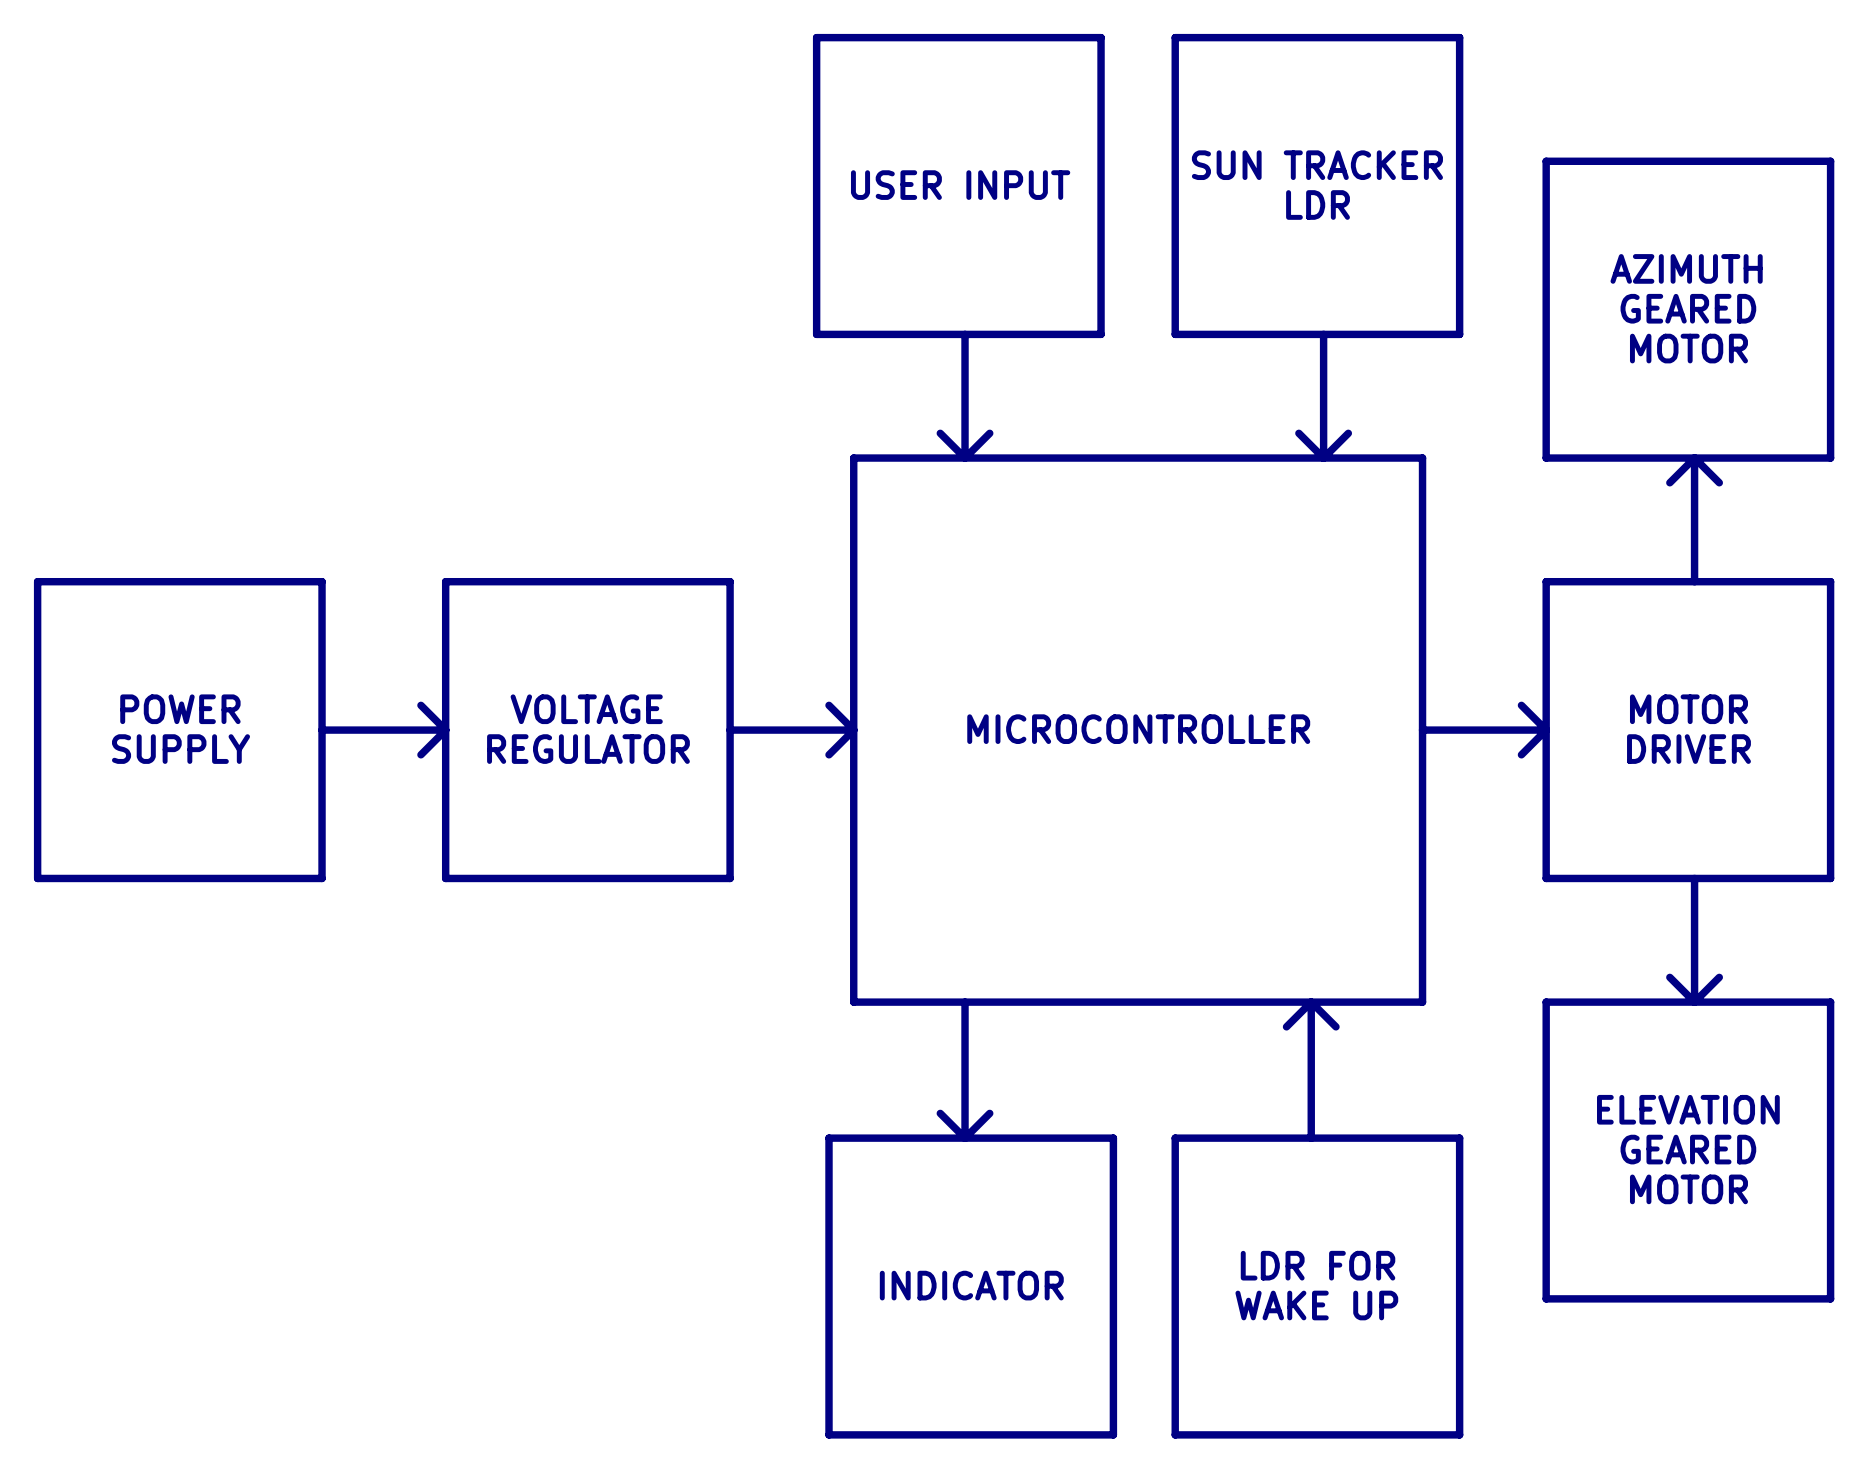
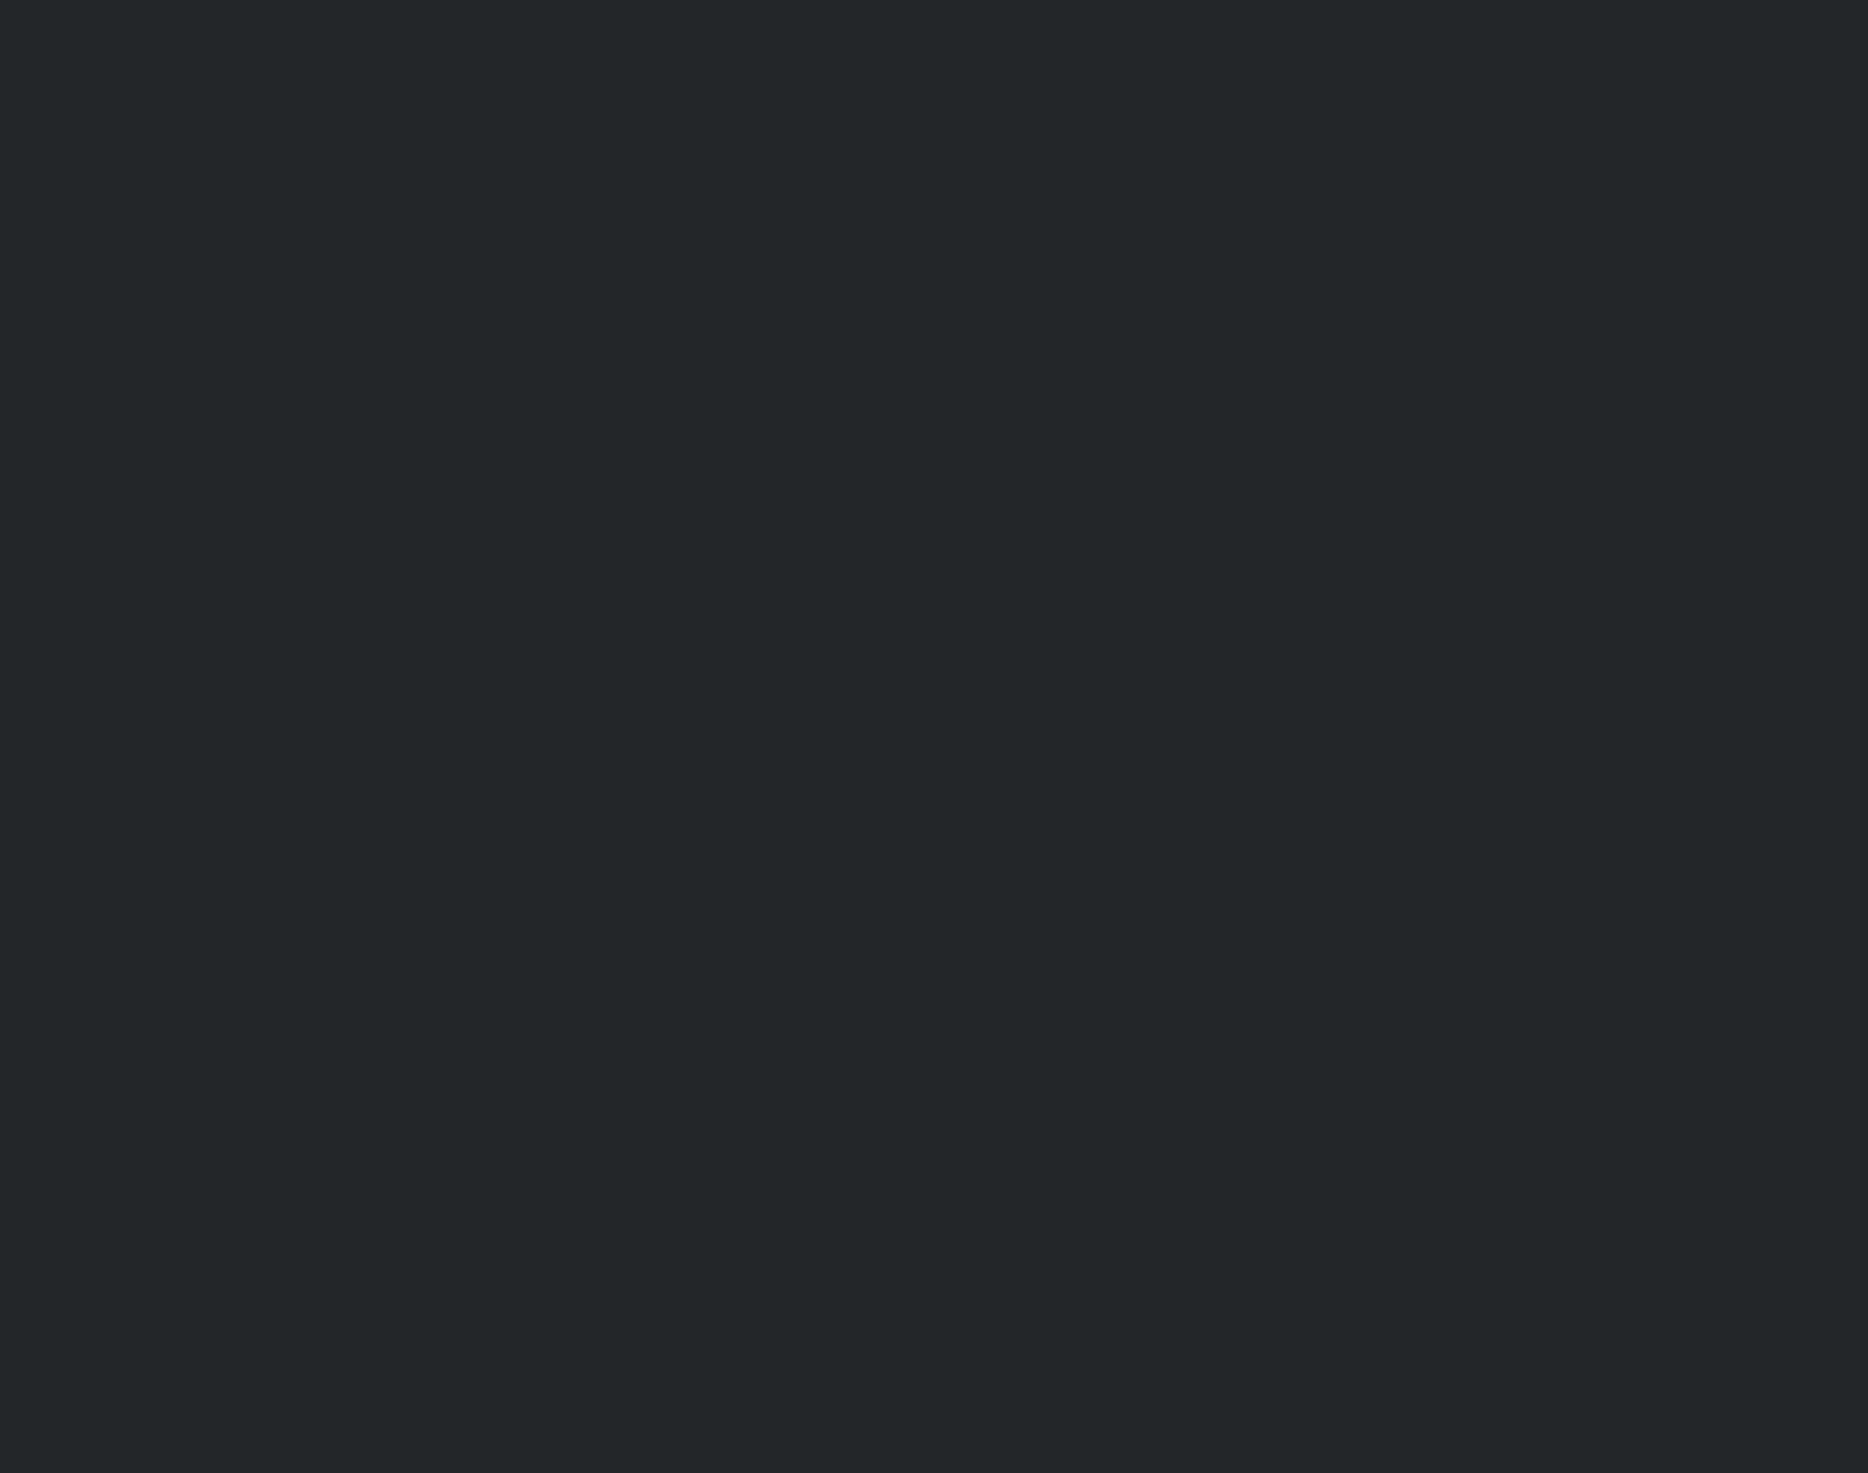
line: (816, 37) (1101, 37) (1101, 334) (816, 334) (816, 37) -> none
line: (1175, 37) (1175, 334) (1459, 334) (1459, 37) (1175, 37) -> none
line: (1546, 161) (1546, 458) (1830, 458) (1830, 161) (1546, 161) -> none
text: SUN TRACKER (1317, 165) -> none
text: USER INPUT (960, 185) -> none
text: LDR (1318, 204) -> none
text: AZIMUTH (1686, 268) -> none
text: GEARED (1688, 308) -> none
line: (965, 334) (965, 458) -> none
line: (1323, 334) (1323, 458) -> none
text: MOTOR (1688, 348) -> none
line: (940, 433) (965, 458) -> none
line: (989, 433) (965, 458) -> none
line: (1298, 433) (1323, 458) -> none
line: (1348, 433) (1323, 458) -> none
line: (853, 458) (1422, 458) (1422, 1002) (853, 1002) (853, 458) -> none
line: (1694, 458) (1694, 581) -> none
line: (1694, 458) (1669, 482) -> none
line: (1694, 458) (1719, 482) -> none
line: (37, 581) (322, 581) (322, 878) (37, 878) (37, 581) -> none
line: (445, 581) (730, 581) (730, 878) (445, 878) (445, 581) -> none
line: (1546, 581) (1830, 581) (1830, 878) (1546, 878) (1546, 581) -> none
line: (420, 705) (445, 730) -> none
line: (829, 705) (853, 730) -> none
line: (1521, 705) (1546, 730) -> none
text: POWER (180, 709) -> none
text: VOLTAGE (586, 709) -> none
text: MOTOR (1688, 709) -> none
text: MICROCONTROLLER (1138, 729) -> none
line: (322, 730) (445, 730) -> none
line: (445, 730) (420, 754) -> none
line: (730, 730) (853, 730) -> none
line: (853, 730) (829, 754) -> none
line: (1422, 730) (1546, 730) -> none
line: (1546, 730) (1521, 754) -> none
text: SUPPLY (181, 749) -> none
text: REGULATOR (588, 749) -> none
text: DRIVER (1688, 749) -> none
line: (1694, 878) (1694, 1002) -> none
line: (1669, 977) (1694, 1002) -> none
line: (1719, 977) (1694, 1002) -> none
line: (965, 1002) (965, 1138) -> none
line: (1311, 1002) (1335, 1026) -> none
line: (1311, 1002) (1286, 1026) -> none
line: (1311, 1002) (1311, 1138) -> none
line: (1546, 1002) (1830, 1002) (1830, 1298) (1546, 1298) (1546, 1002) -> none
text: ELEVATION (1688, 1109) -> none
line: (940, 1113) (965, 1138) -> none
line: (989, 1113) (965, 1138) -> none
line: (829, 1138) (1113, 1138) (1113, 1434) (829, 1434) (829, 1138) -> none
line: (1175, 1138) (1459, 1138) (1459, 1434) (1175, 1434) (1175, 1138) -> none
text: GEARED (1688, 1149) -> none
text: MOTOR (1688, 1189) -> none
text: LDR FOR (1318, 1265) -> none
text: INDICATOR (971, 1285) -> none
text: WAKE UP (1316, 1305) -> none

